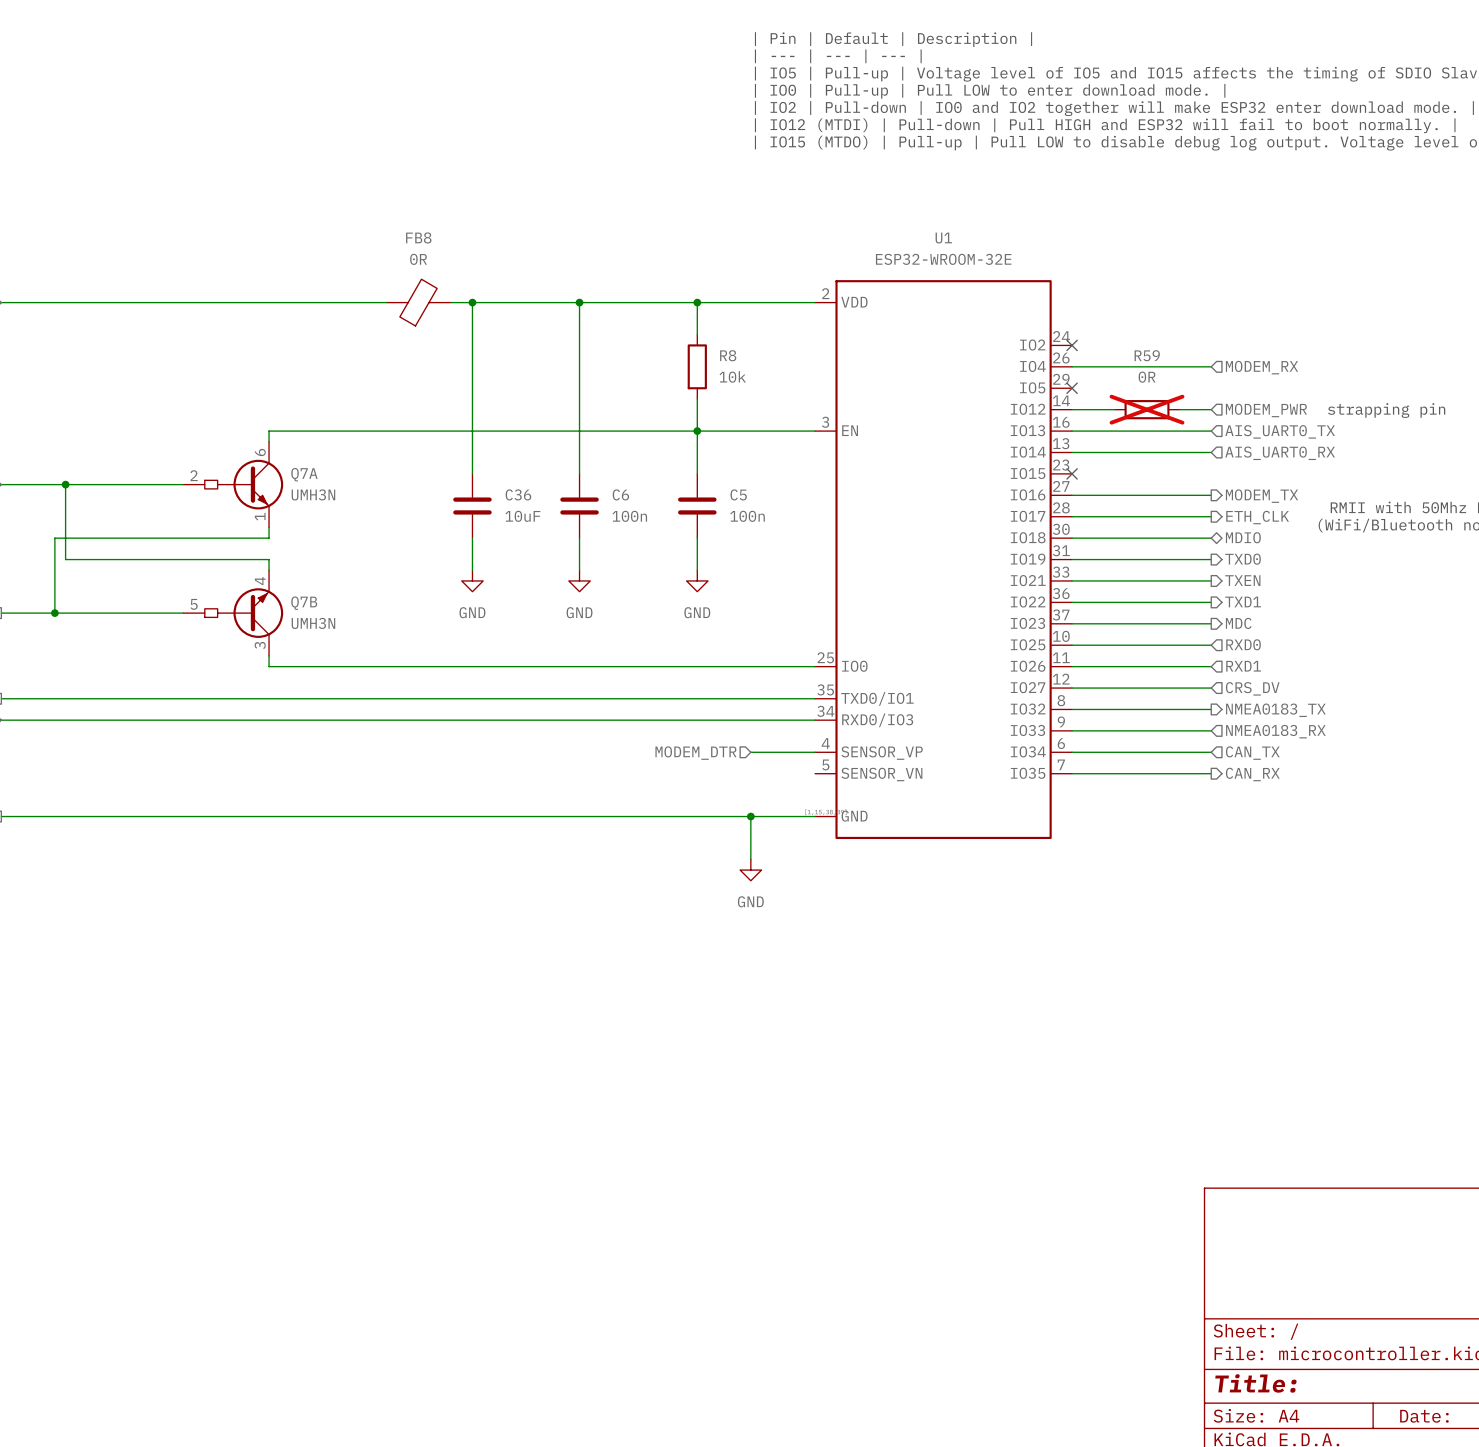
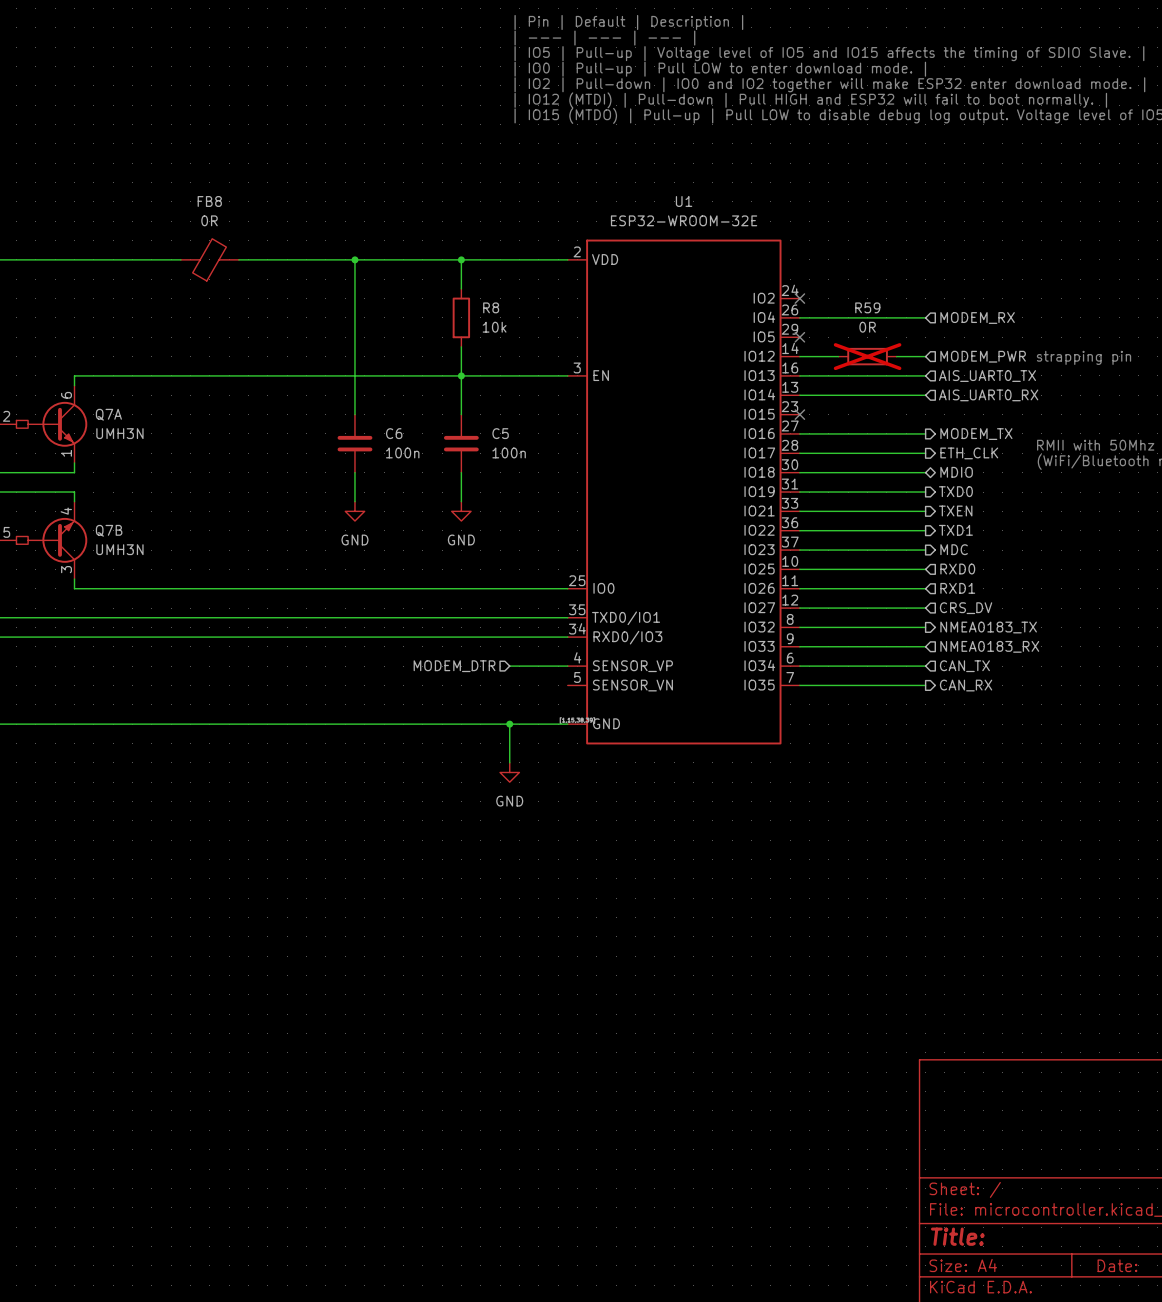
wire: (472, 302) (472, 473) -> none
junction: (472, 302) -> none
C36: 10uF (472, 506) -> none
wire: (472, 538) (472, 570) -> none
power symbol: GND (472, 580) -> none

